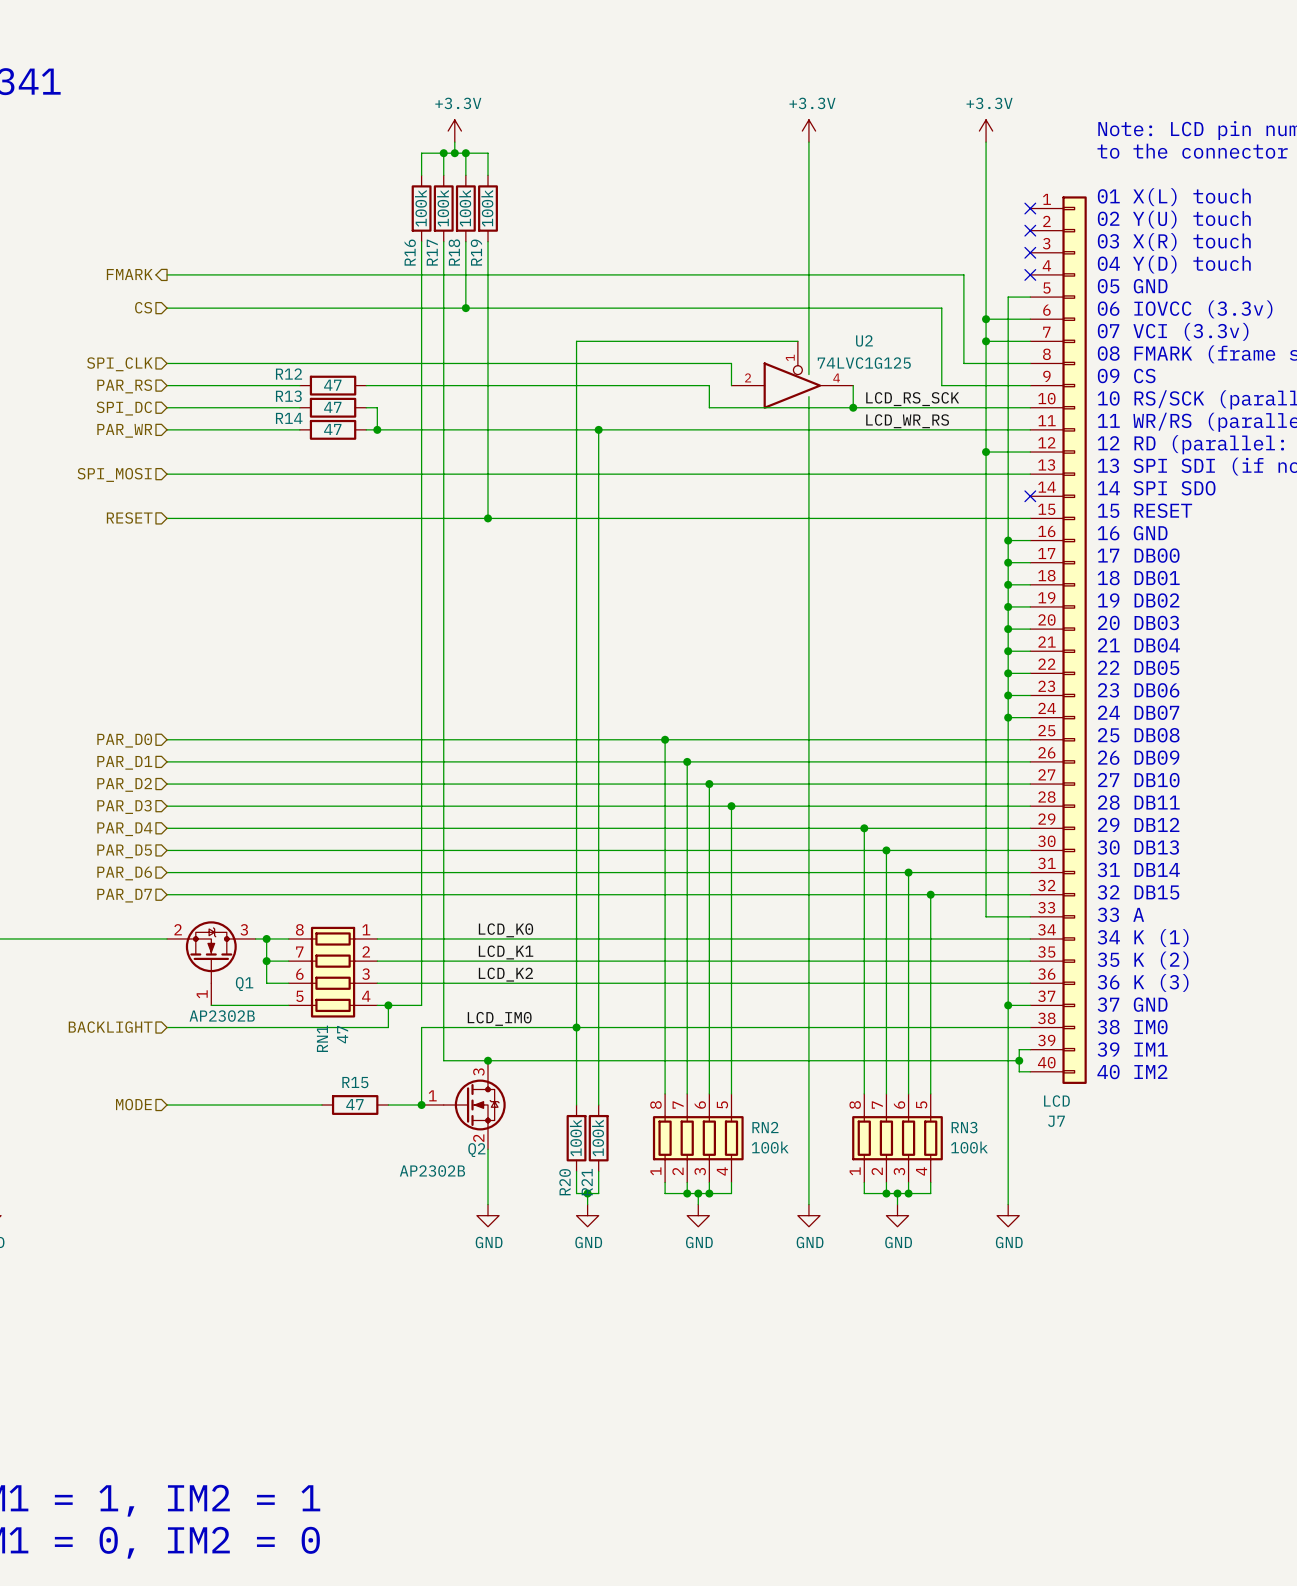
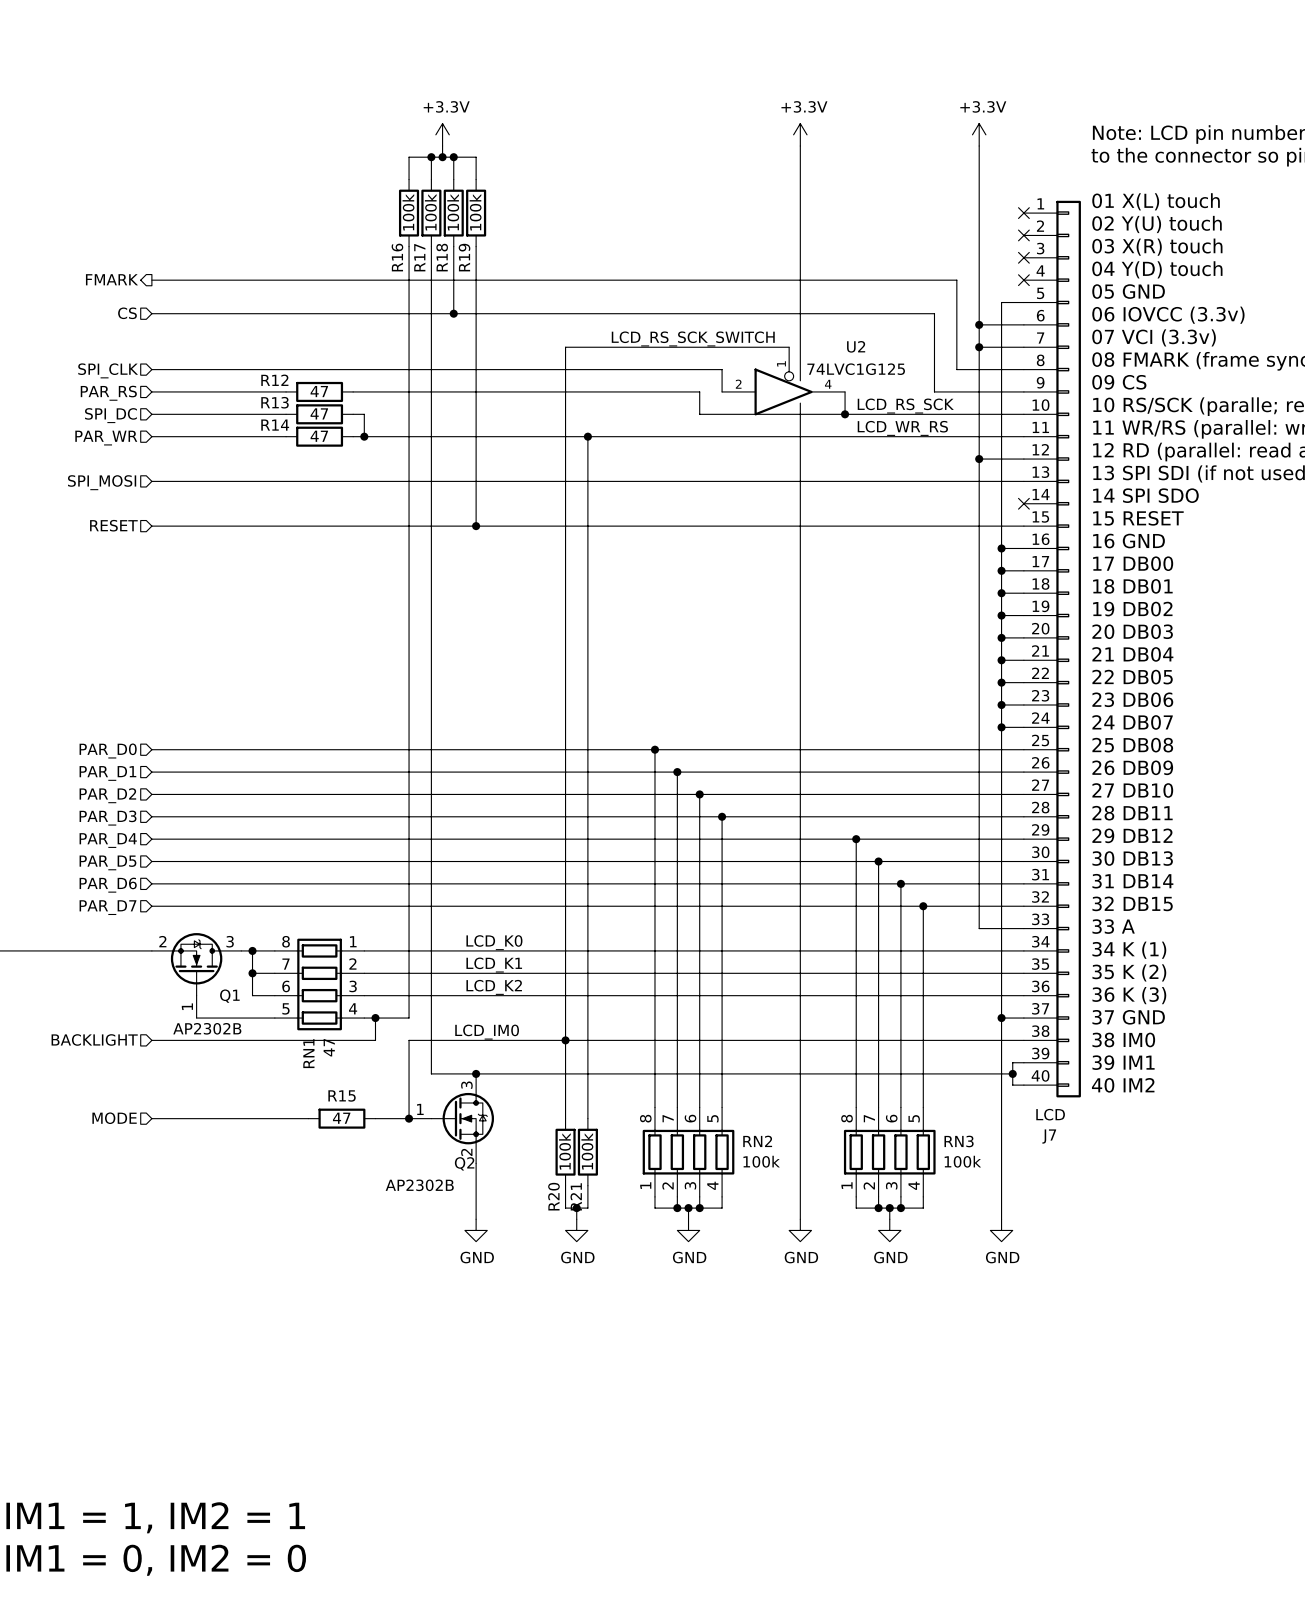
label: none -> LCD_RS_SCK_SWITCH (693, 338)

